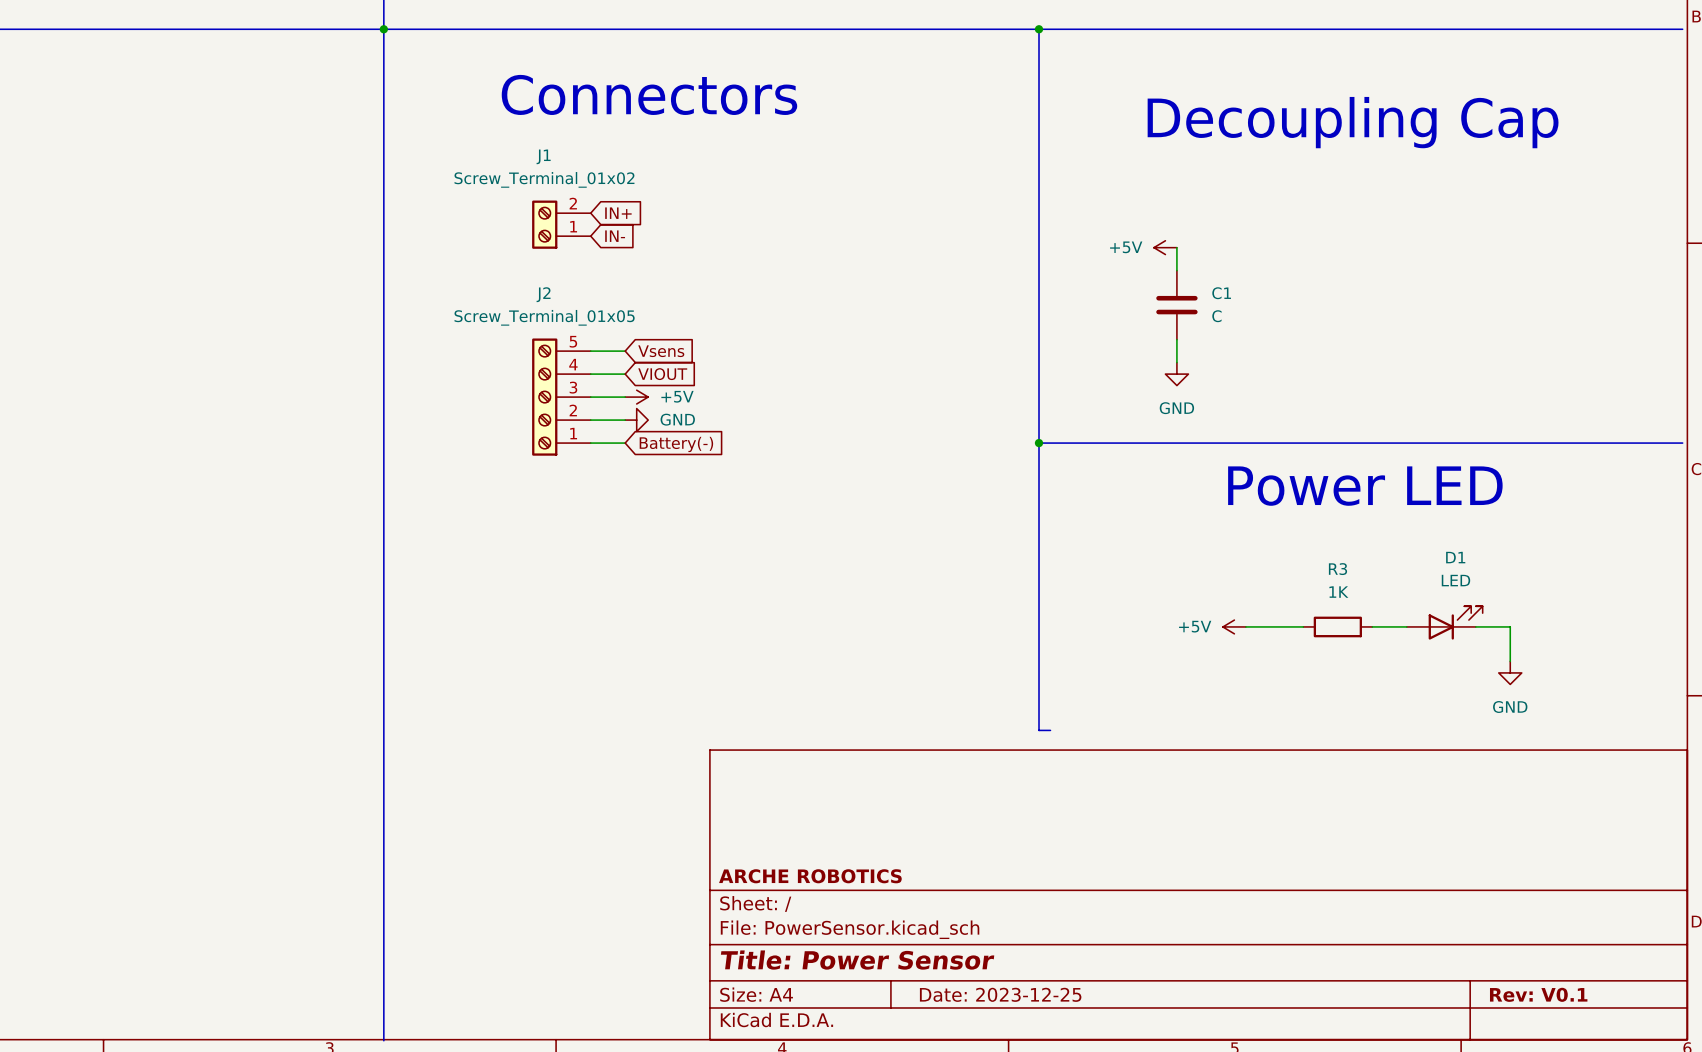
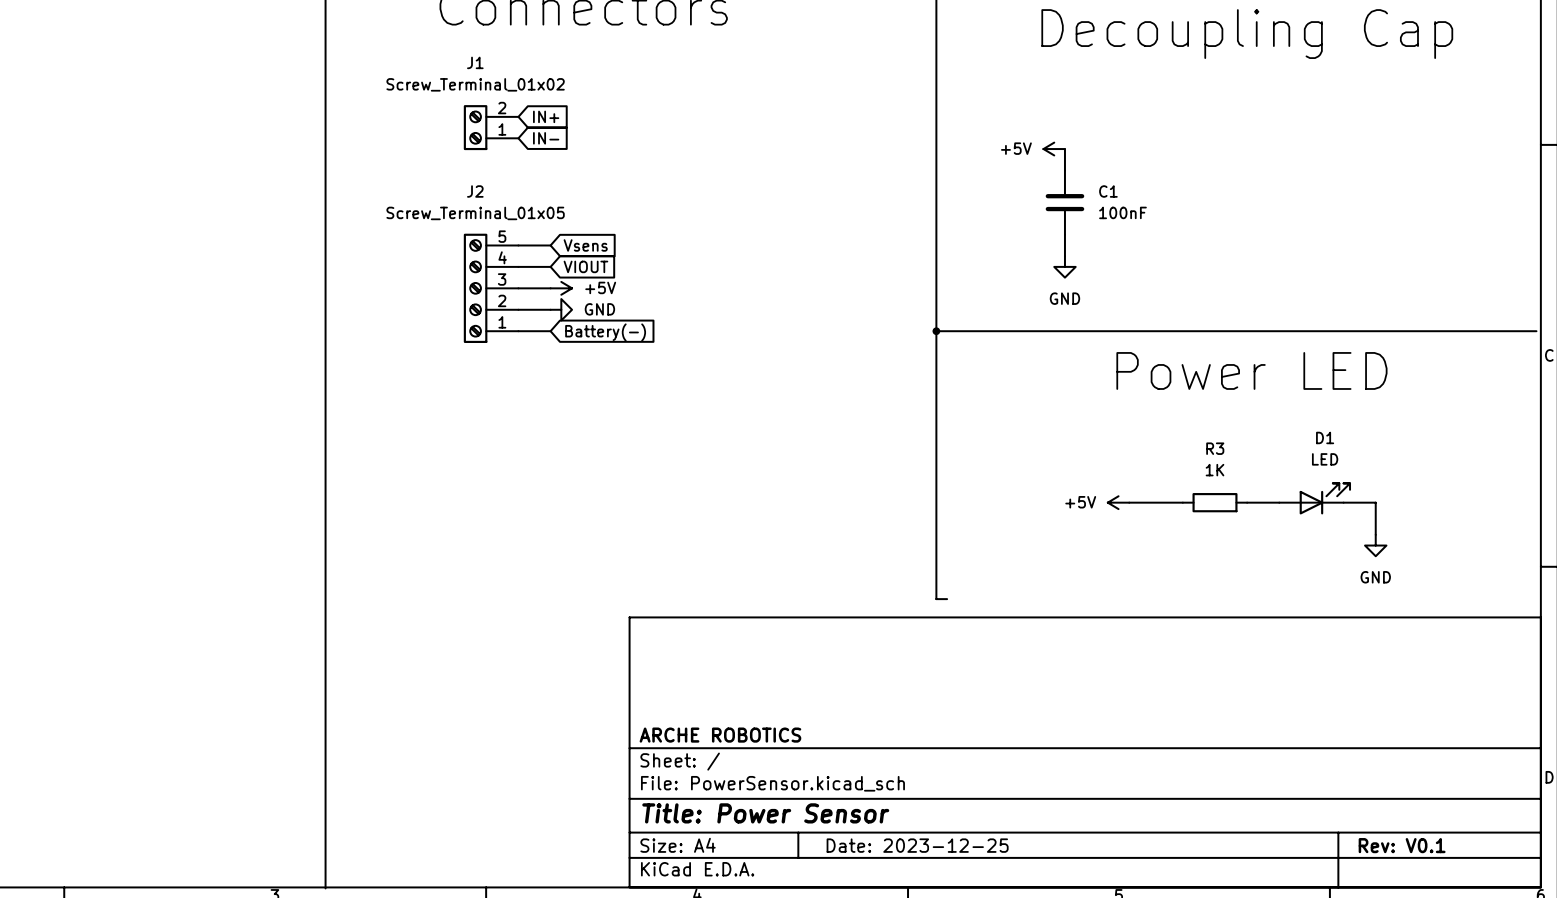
C1 value: C (1216, 316) -> 100nF (1122, 212)

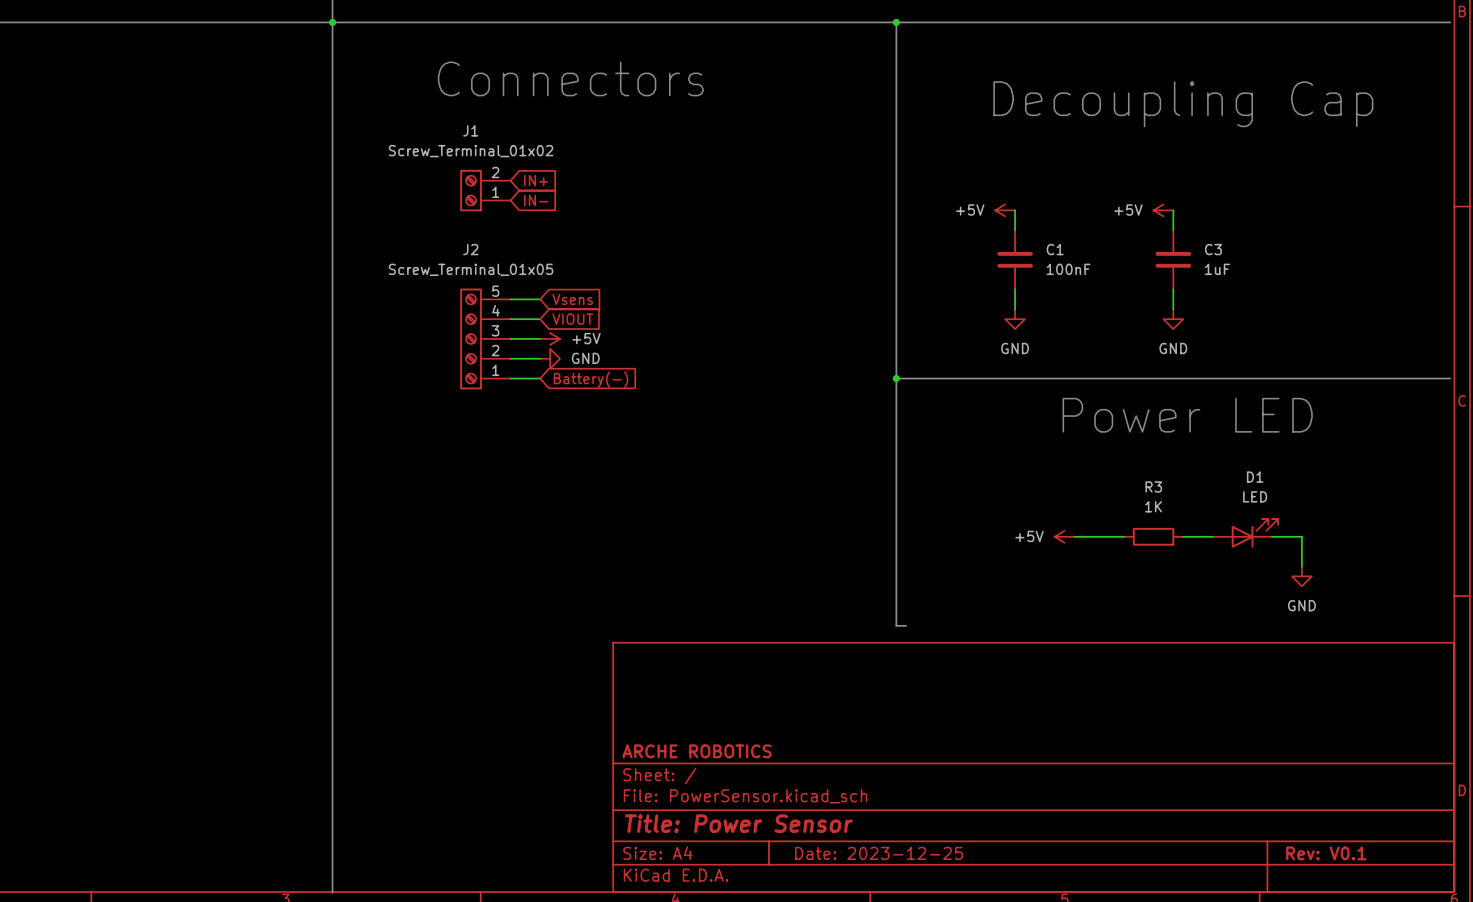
power symbol: none -> +5V (1163, 210)
wire: none -> (1173, 210) (1173, 230)
C3: none -> 1uF (1173, 259)
wire: none -> (1173, 289) (1173, 309)
power symbol: none -> GND (1173, 319)

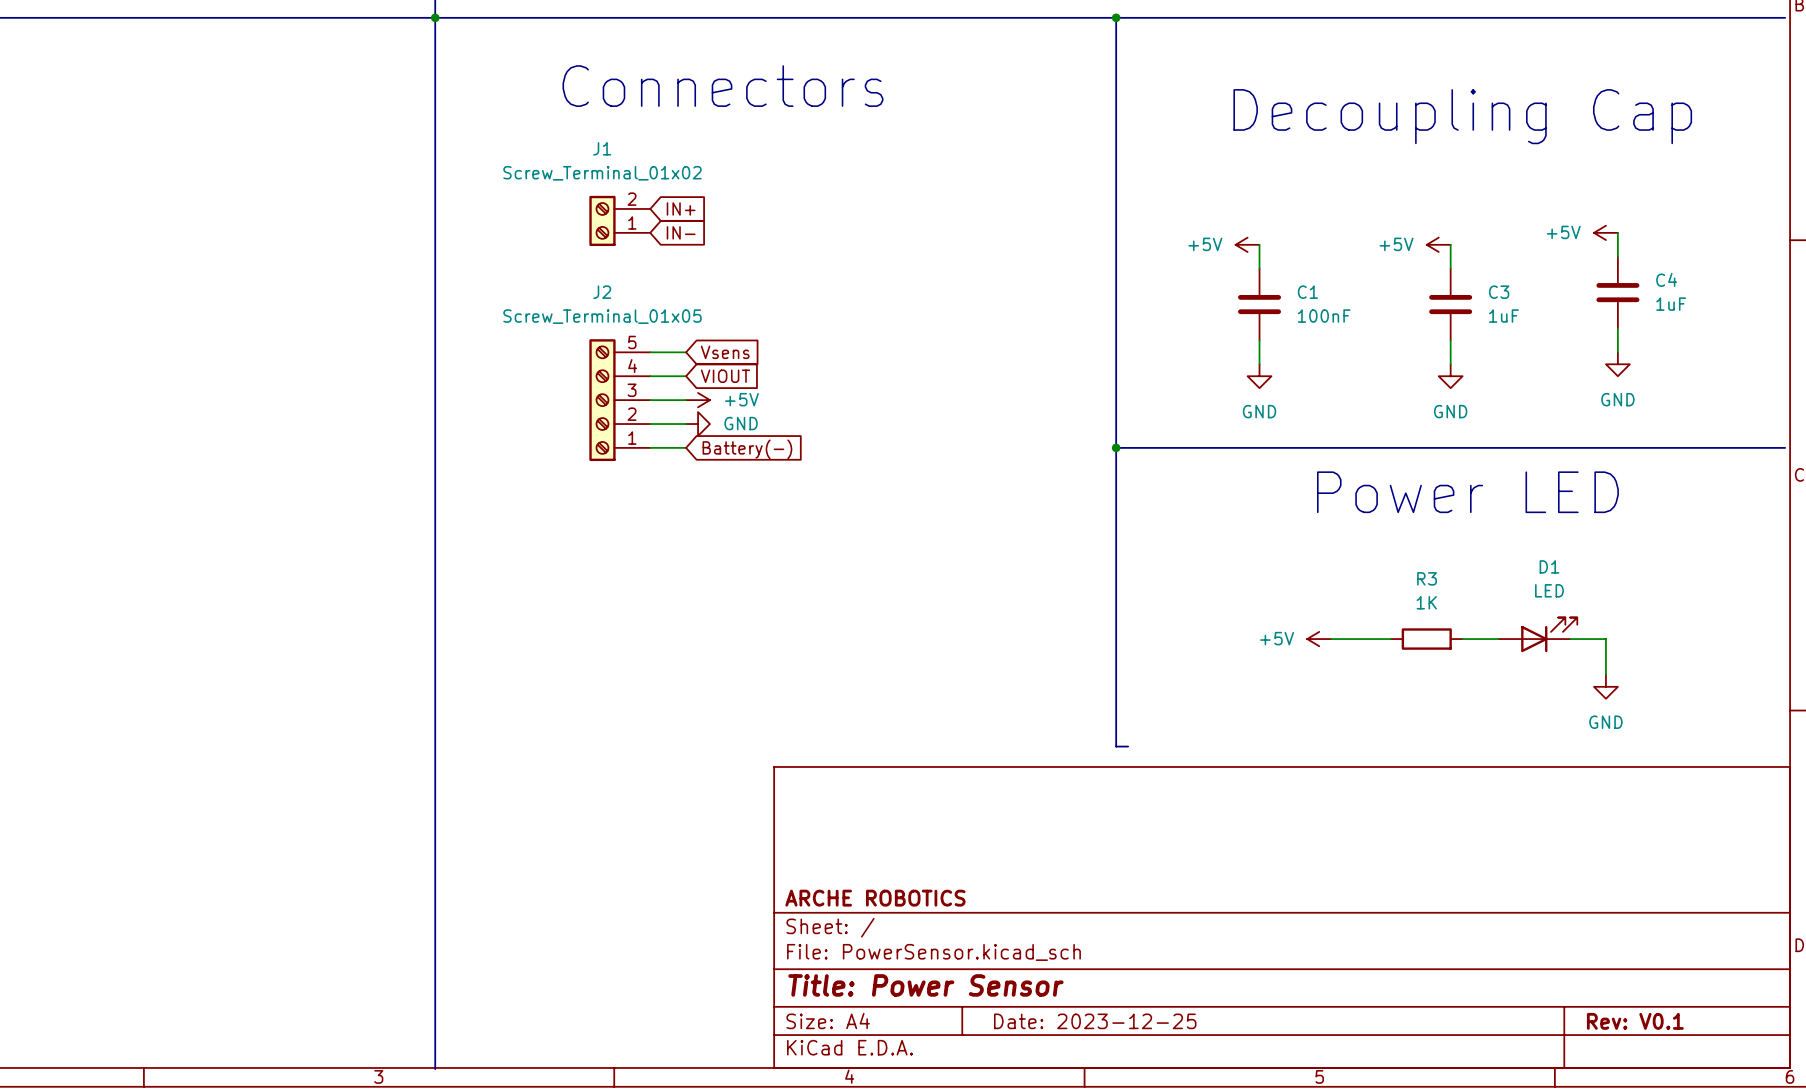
power symbol: none -> +5V (1605, 232)
wire: none -> (1617, 232) (1617, 256)
C4: none -> 1uF (1617, 292)
wire: none -> (1617, 328) (1617, 352)
power symbol: none -> GND (1617, 364)

